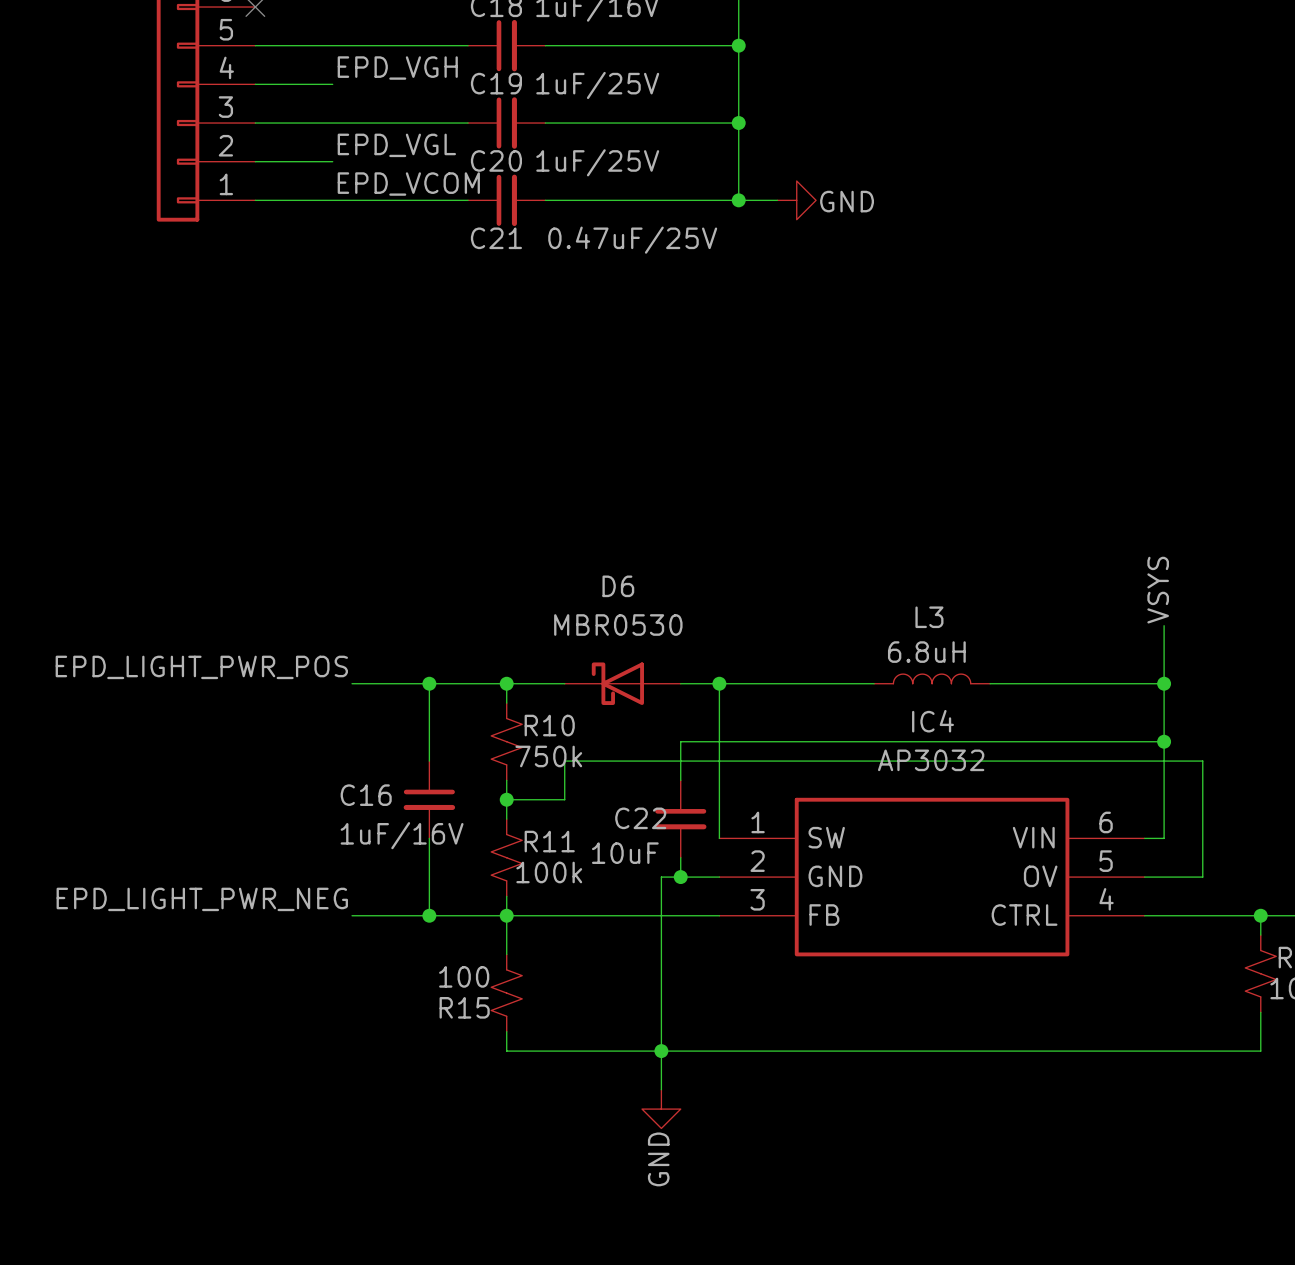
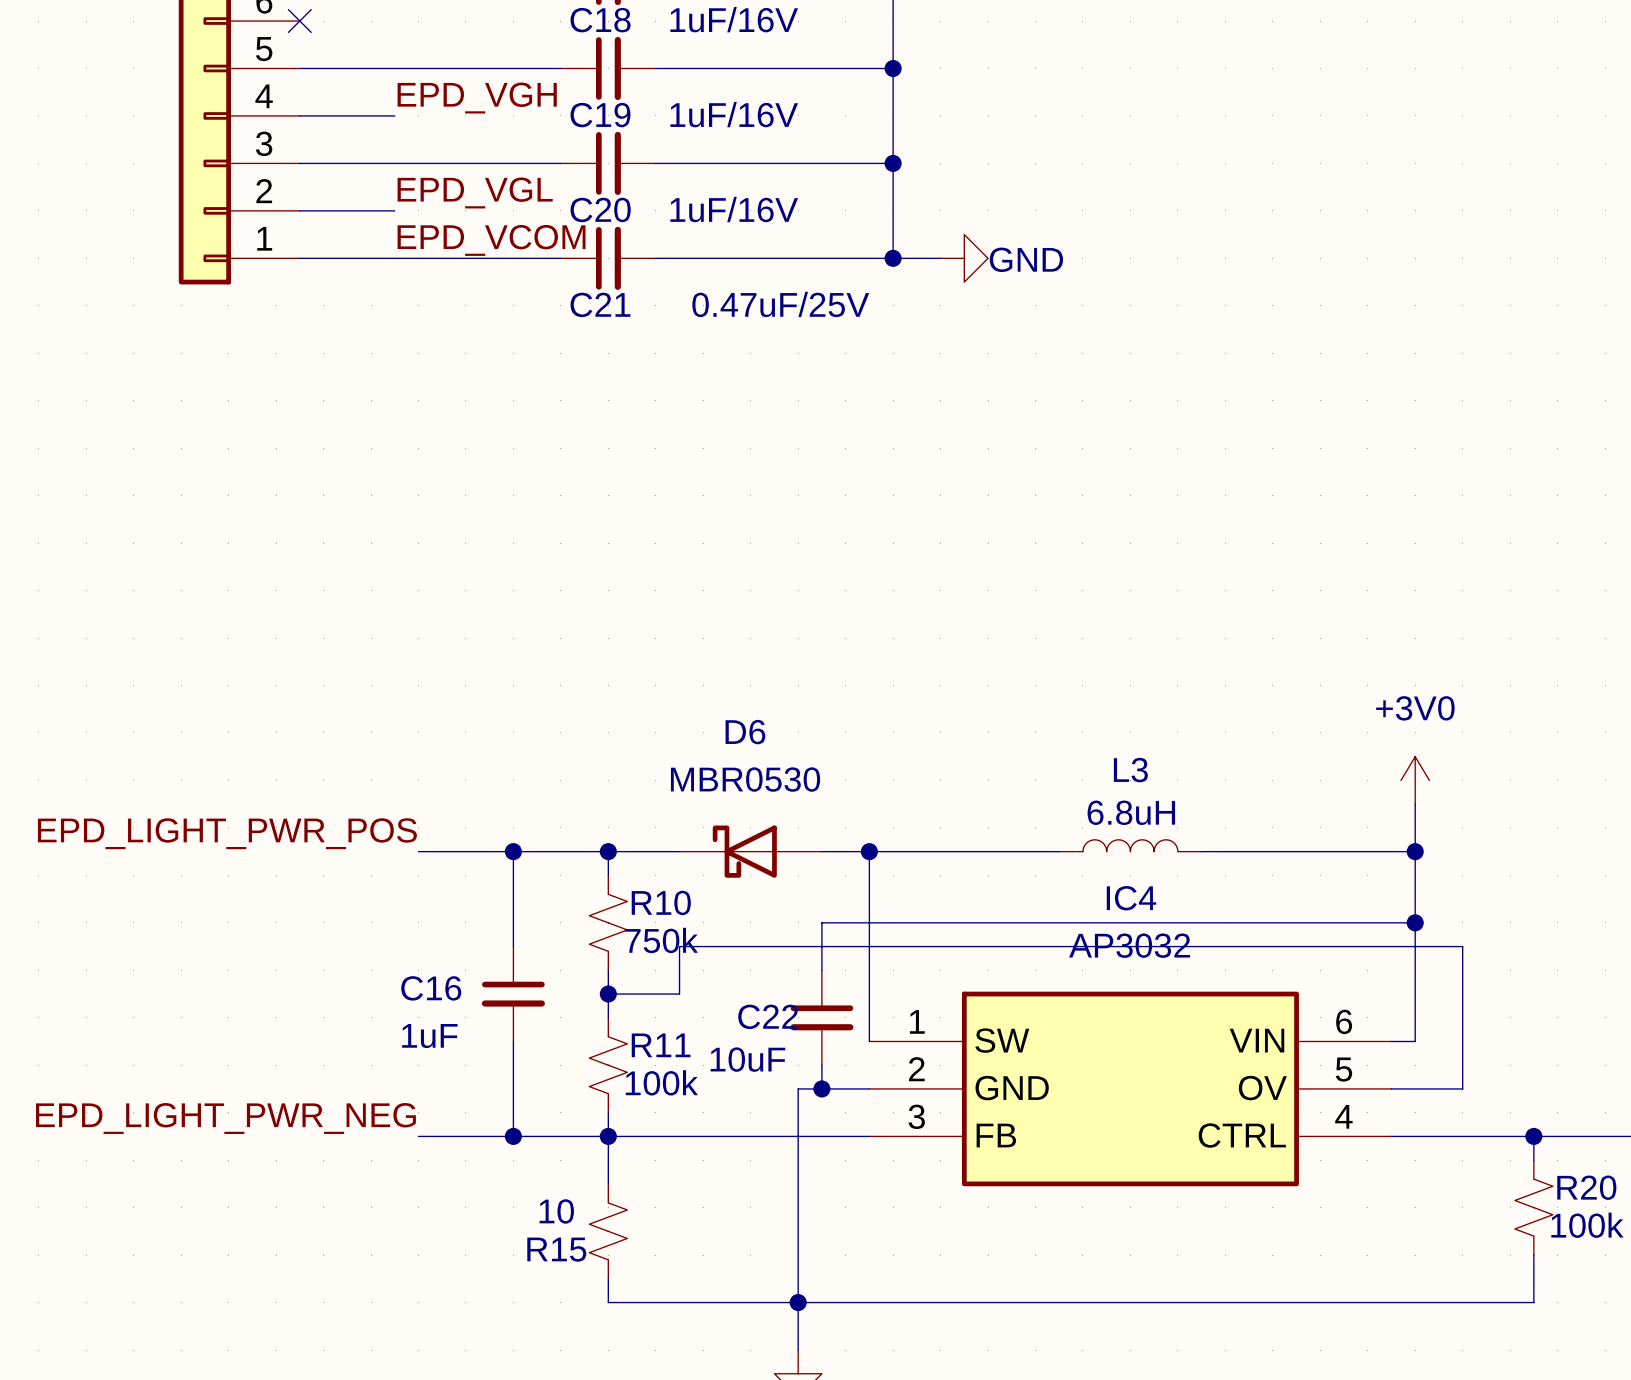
C19 value: 1uF/25V (597, 85) -> 1uF/16V (734, 114)
C20 value: 1uF/25V (597, 162) -> 1uF/16V (734, 209)
label: VSYS (1158, 590) -> none
power symbol: none -> +3V0 (1415, 780)
C16 value: 1uF/16V (402, 835) -> 1uF (429, 1036)
R15 value: 100 (464, 976) -> 10 (556, 1211)

